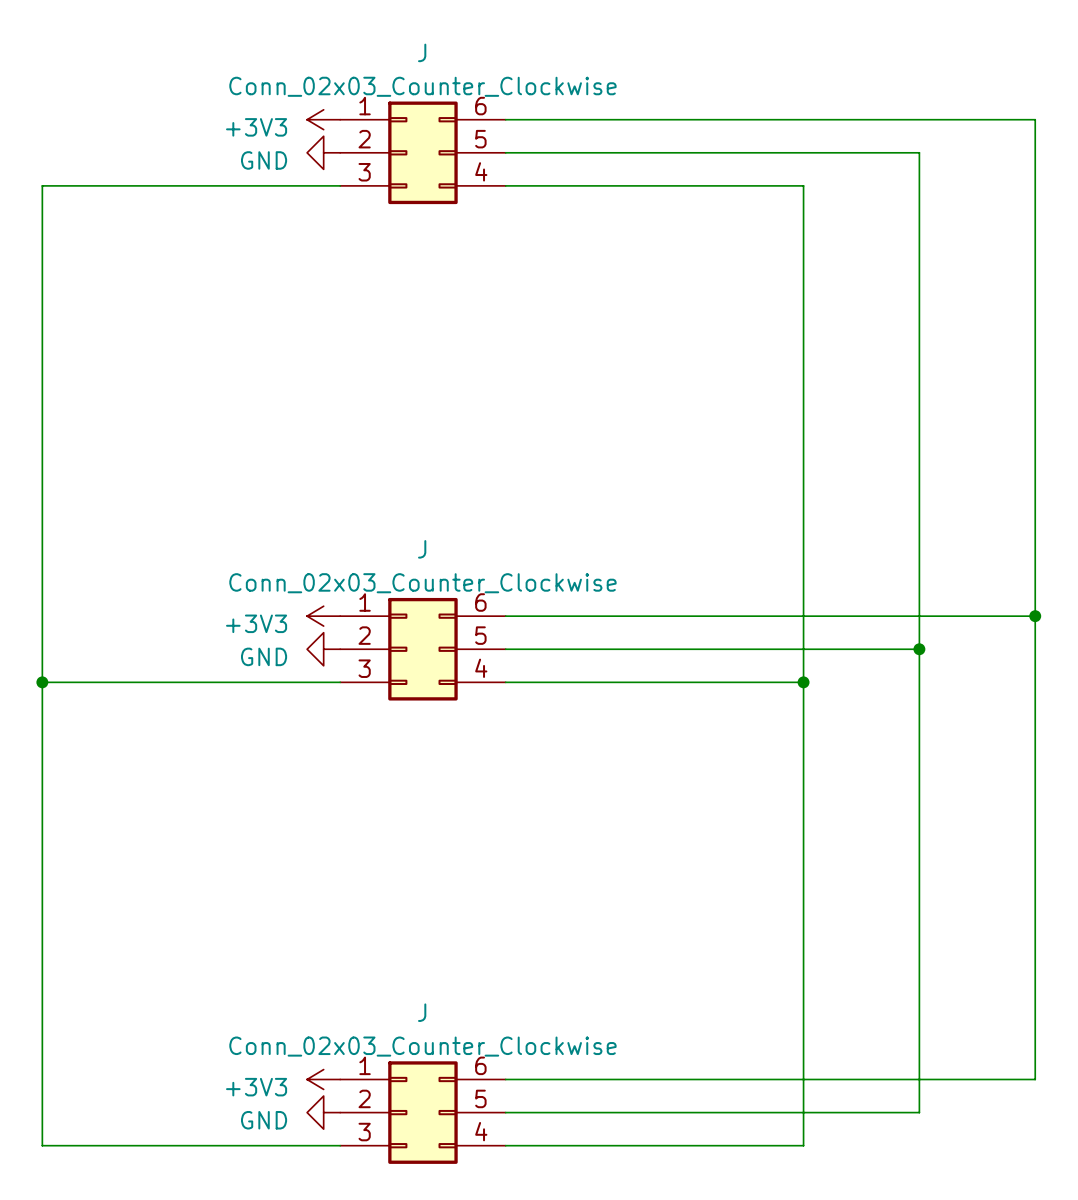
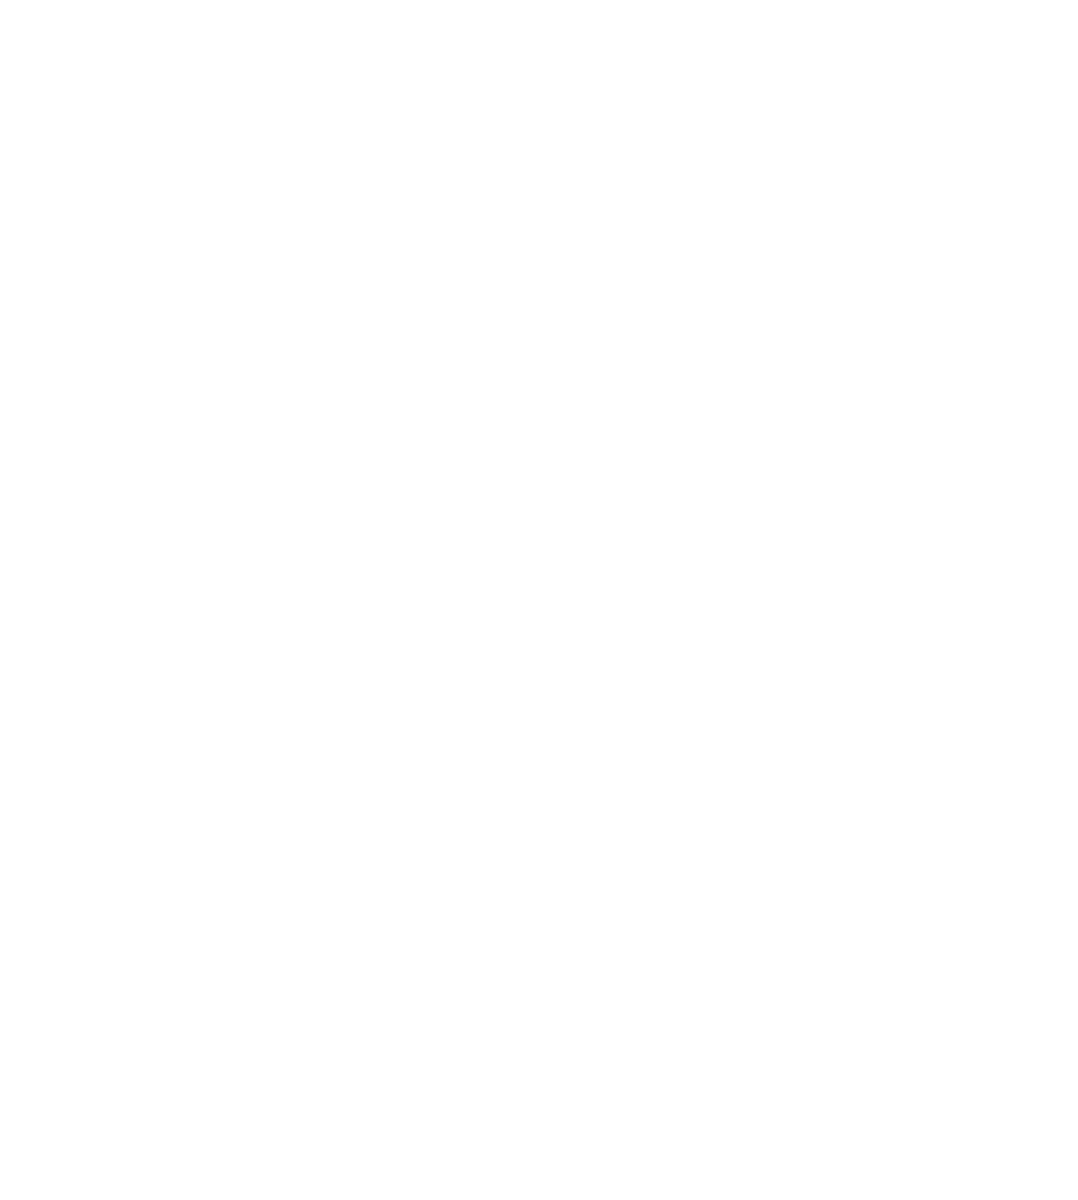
power symbol: +3V3 (323, 119) -> none
wire: (505, 119) (1035, 119) (1035, 1079) (505, 1079) -> none
power symbol: GND (323, 152) -> none
J: Conn_02x03_Counter_Clockwise (422, 152) -> none
wire: (505, 152) (919, 152) (919, 1112) (505, 1112) -> none
wire: (340, 185) (42, 185) (42, 1145) (340, 1145) -> none
wire: (505, 185) (803, 185) (803, 1145) (505, 1145) -> none
power symbol: +3V3 (323, 616) -> none
wire: (505, 616) (1035, 616) -> none
junction: (1035, 616) -> none
power symbol: GND (323, 649) -> none
J: Conn_02x03_Counter_Clockwise (422, 649) -> none
wire: (505, 649) (919, 649) -> none
junction: (919, 649) -> none
wire: (42, 682) (340, 682) -> none
junction: (42, 682) -> none
wire: (505, 682) (803, 682) -> none
junction: (803, 682) -> none
power symbol: +3V3 (323, 1079) -> none
power symbol: GND (323, 1112) -> none
J: Conn_02x03_Counter_Clockwise (422, 1112) -> none

